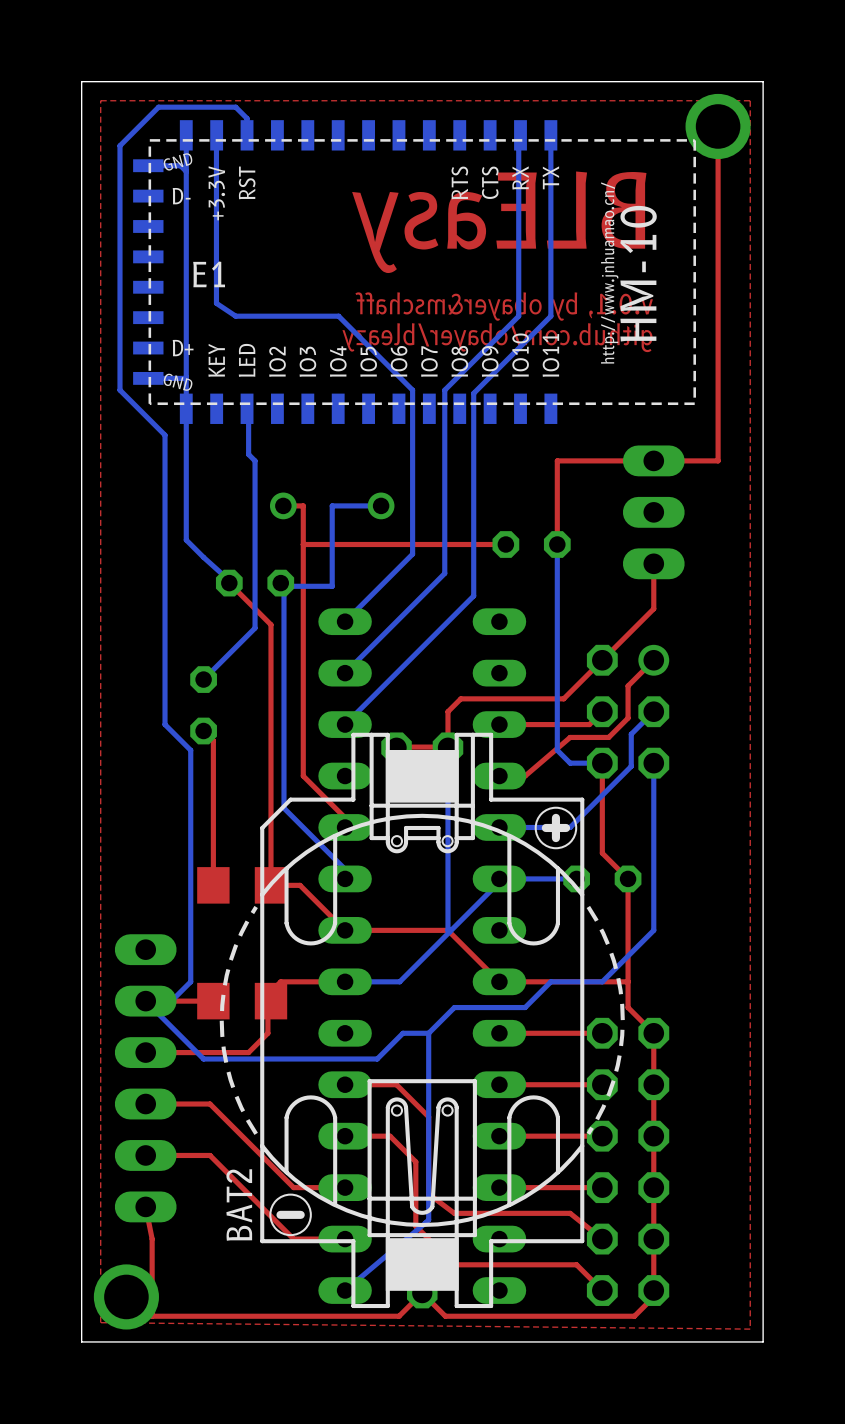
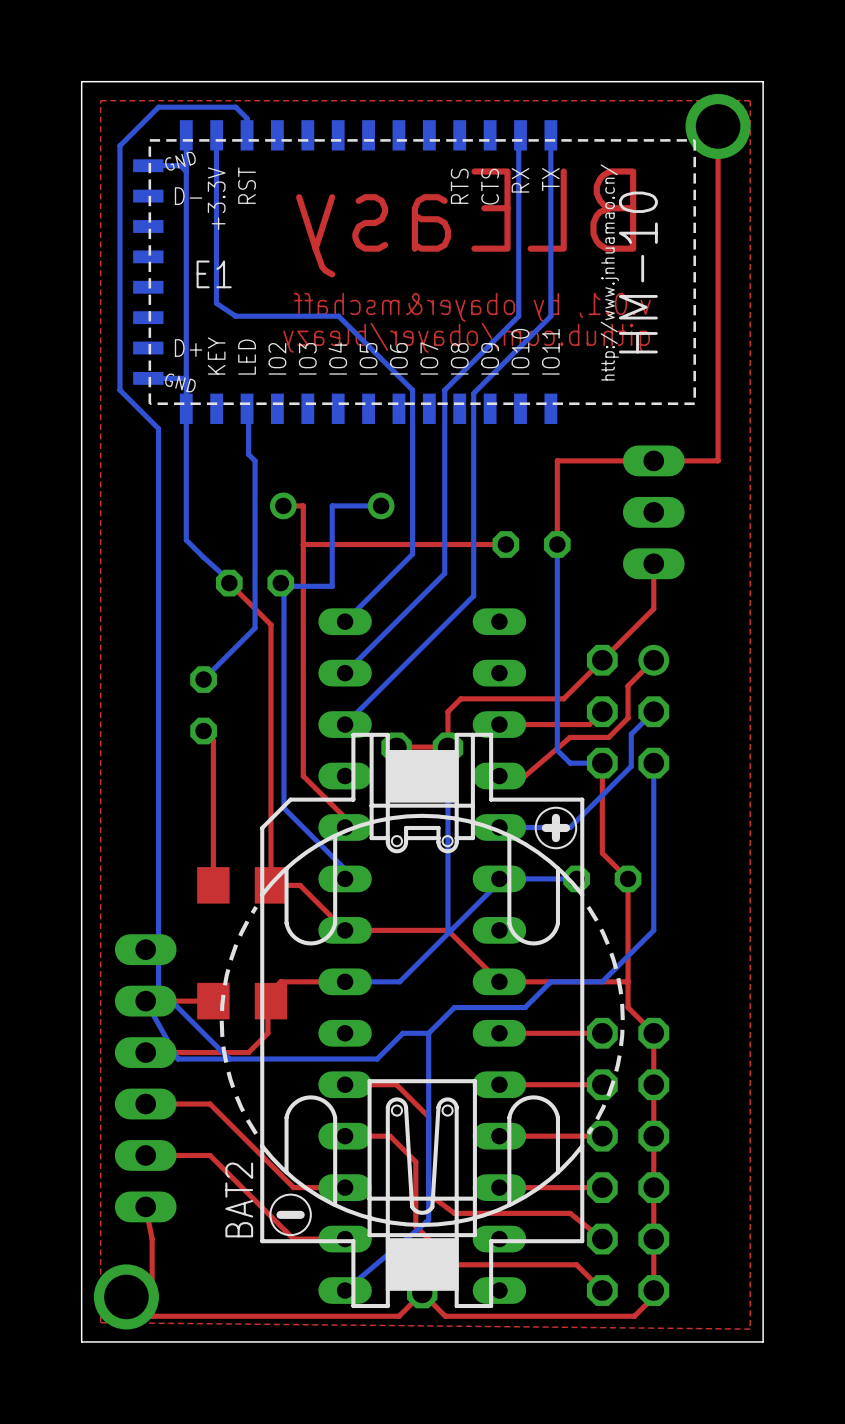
bottom track: (158, 428) (165, 435) (165, 724) (190, 750) (190, 981) (171, 1001) (145, 1001) (203, 1059) -> (158, 428) (158, 988) (229, 1059)
bottom track: none -> (145, 1001) (177, 1059) (203, 1059)

